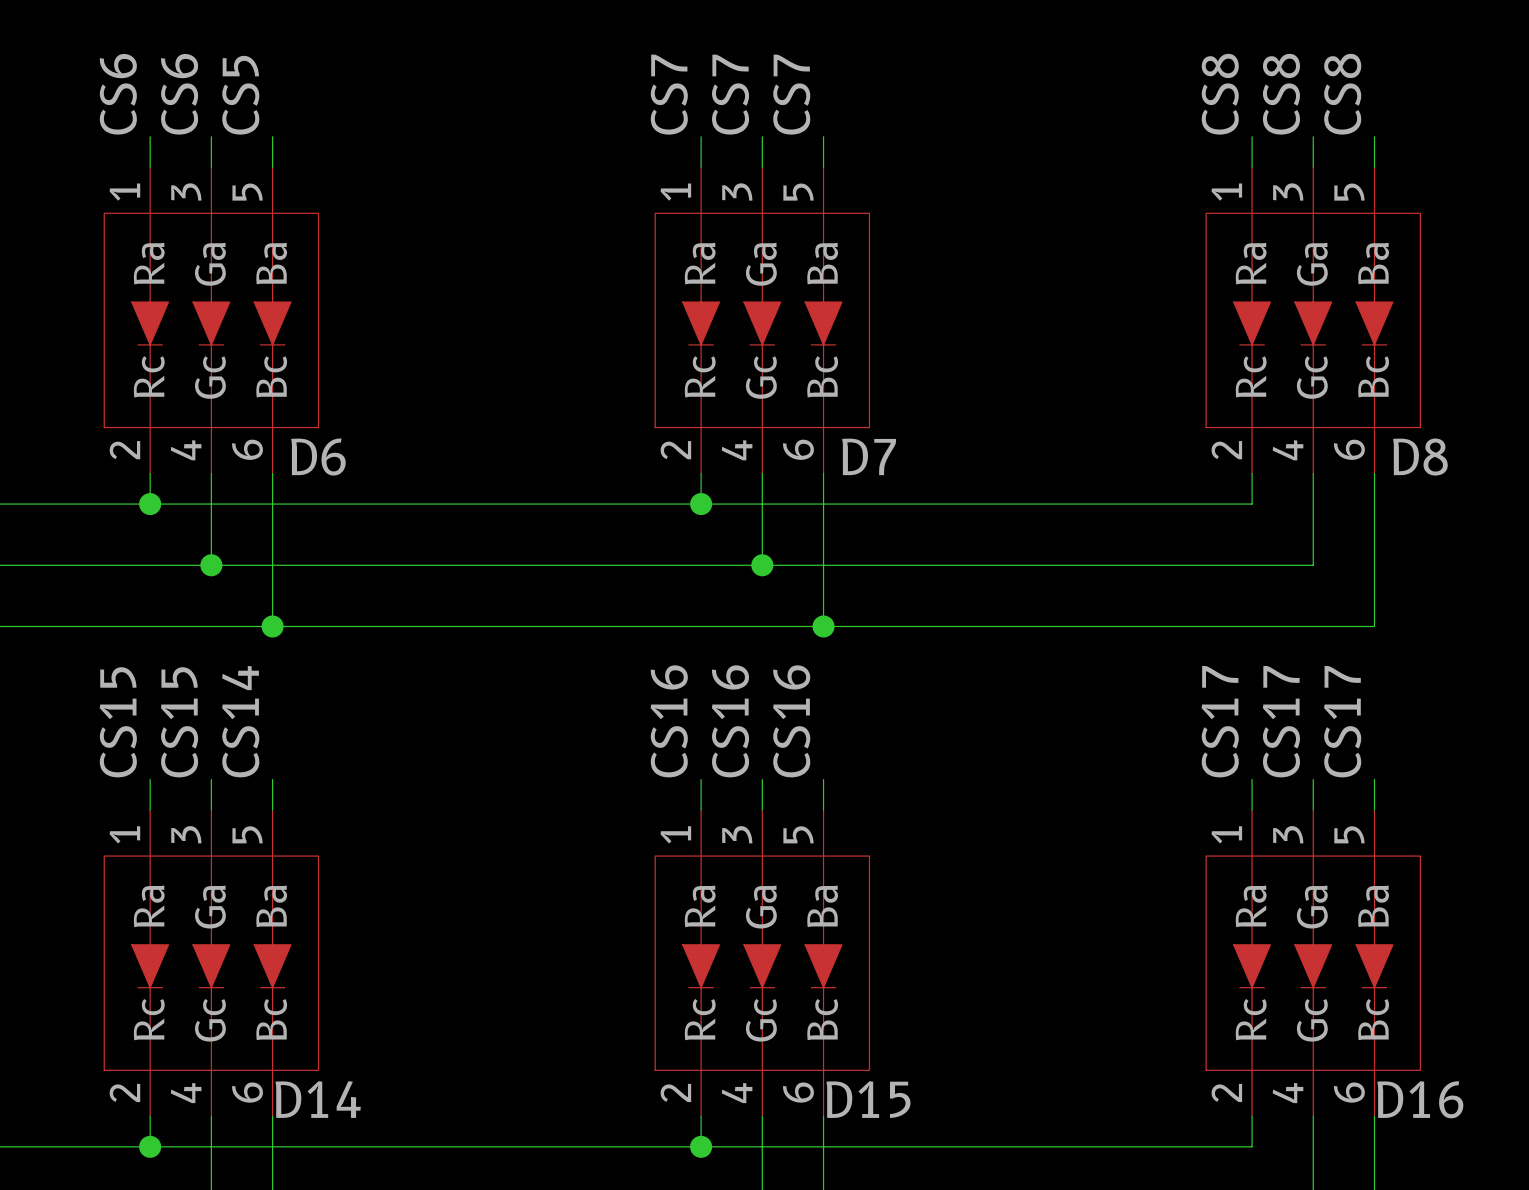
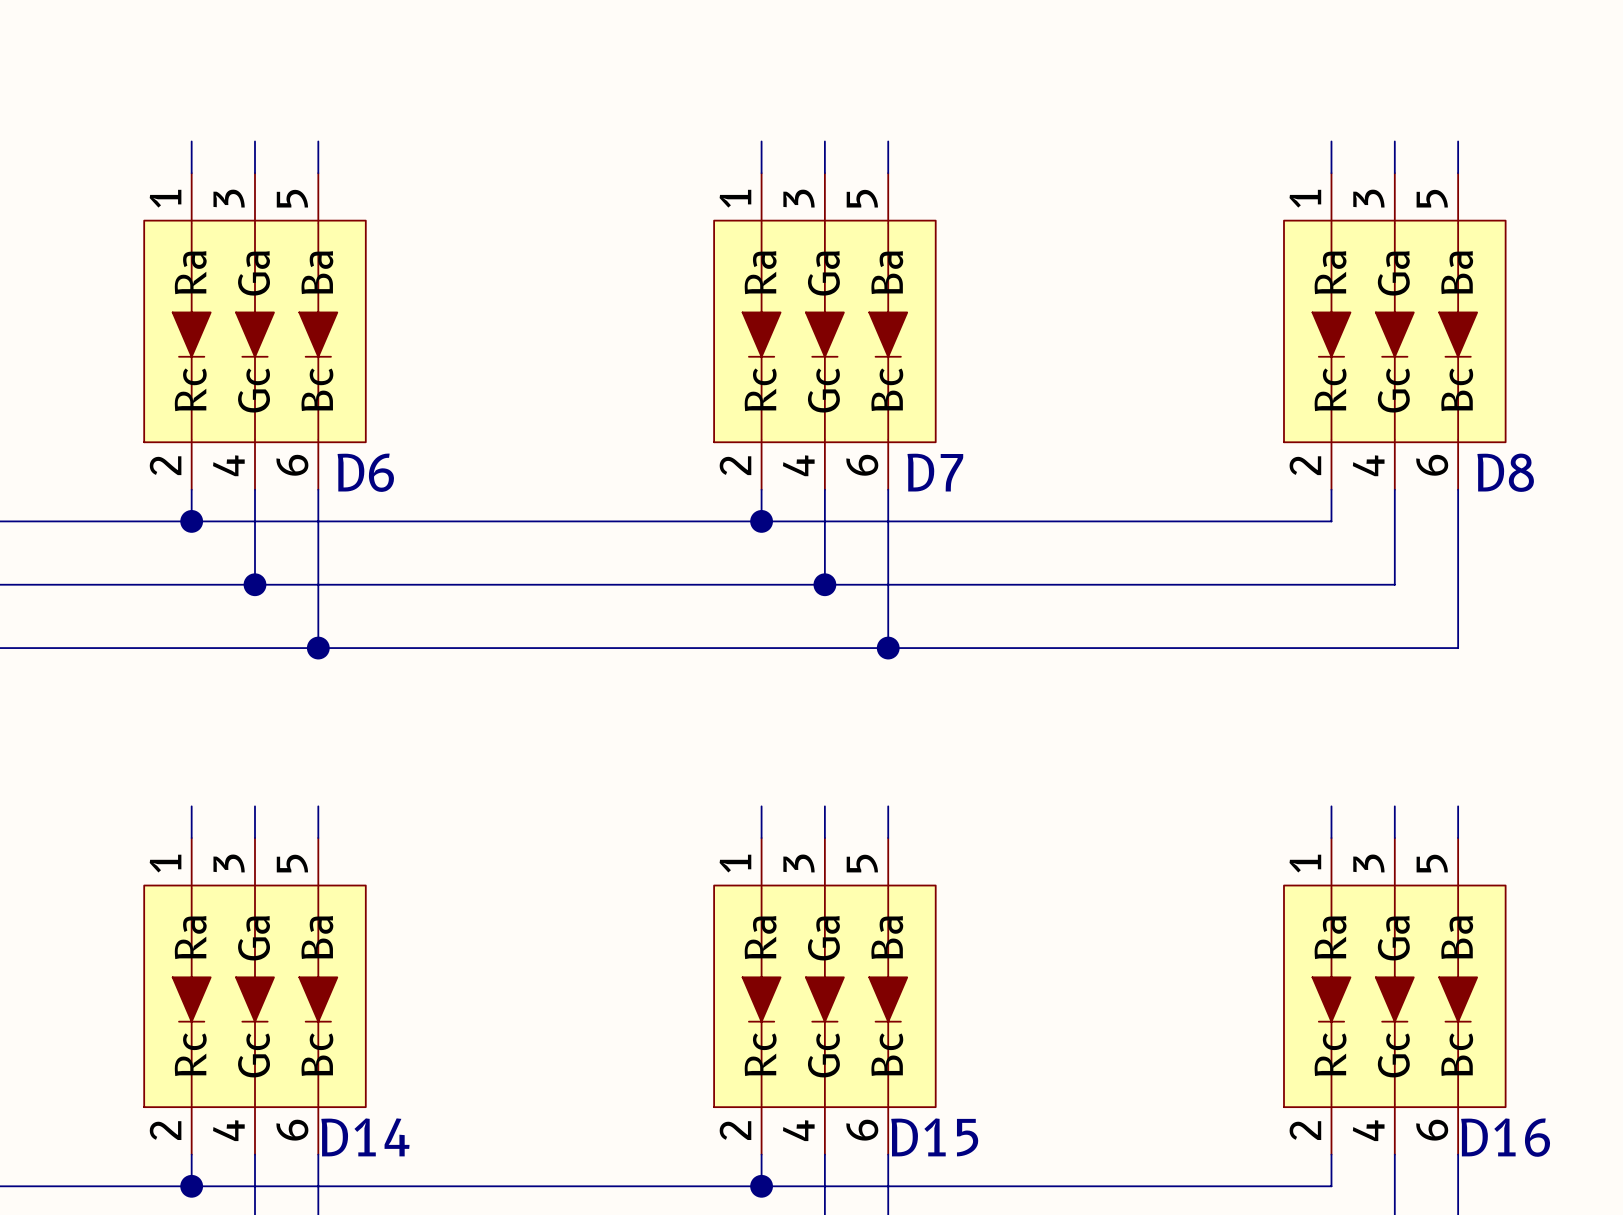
label: CS6 (118, 94) -> none
label: CS6 (179, 94) -> none
label: CS7 (669, 94) -> none
label: CS7 (730, 94) -> none
label: CS7 (791, 94) -> none
label: CS8 (1220, 94) -> none
label: CS8 (1281, 94) -> none
label: CS8 (1342, 94) -> none
label: CS5 (240, 95) -> none
label: CS14 (240, 721) -> none
label: CS16 (669, 721) -> none
label: CS16 (730, 721) -> none
label: CS16 (791, 721) -> none
label: CS17 (1220, 721) -> none
label: CS17 (1281, 721) -> none
label: CS17 (1342, 721) -> none
label: CS15 (118, 722) -> none
label: CS15 (179, 722) -> none

